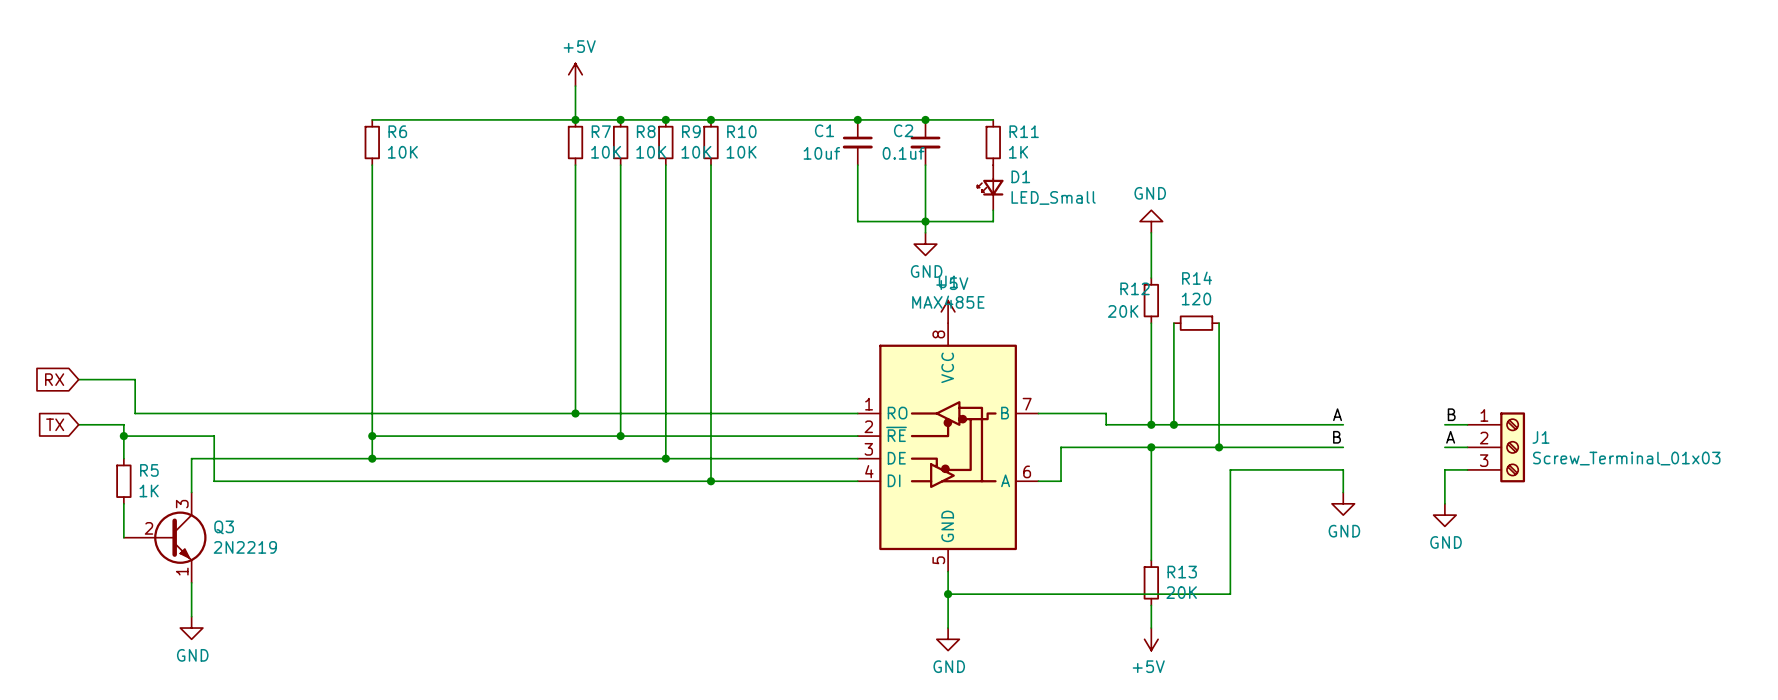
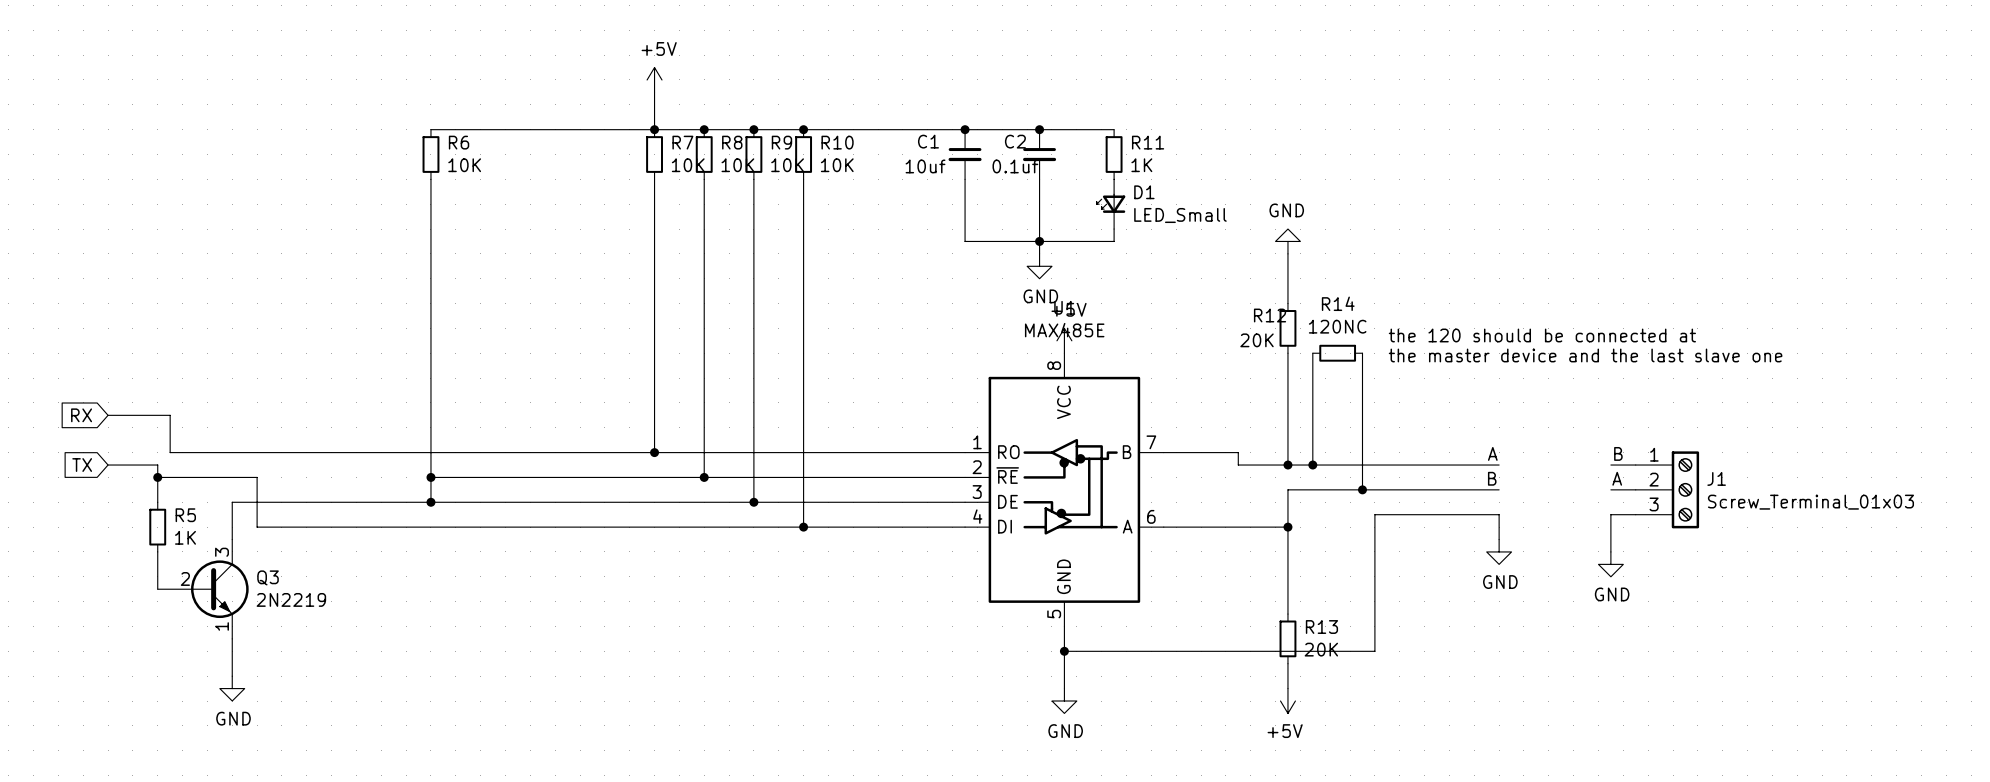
R14 value: 120 (1196, 299) -> 120NC (1337, 326)
text: none -> the 120 should be connected at (1542, 335)
text: none -> the master device and the last slave one (1585, 355)
wire: (1151, 447) (1061, 447) (1061, 481) -> (1287, 527) (1188, 527)
junction position: (1151, 447) -> (1287, 527)

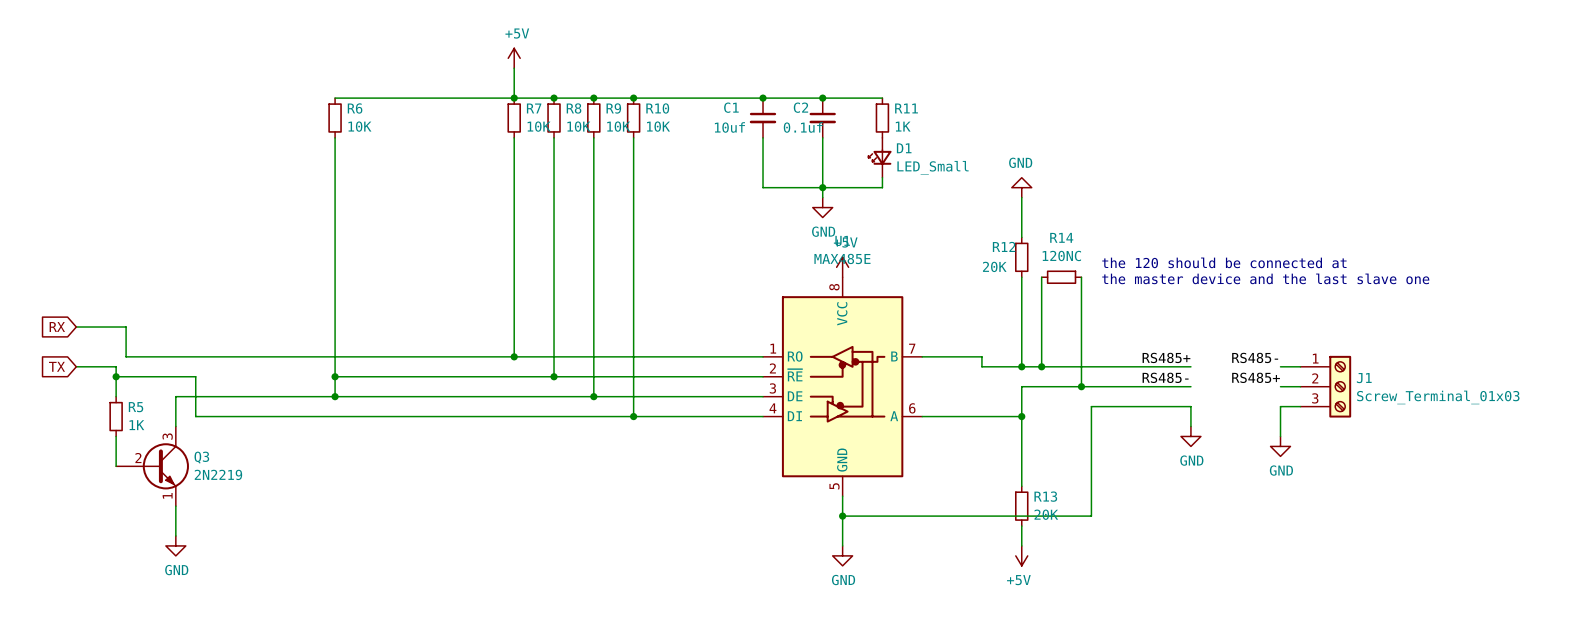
label: A (1492, 453) -> RS485+ (1166, 357)
label: B (1618, 453) -> RS485- (1255, 357)
label: B (1492, 478) -> RS485- (1165, 377)
label: A (1617, 478) -> RS485+ (1256, 377)

